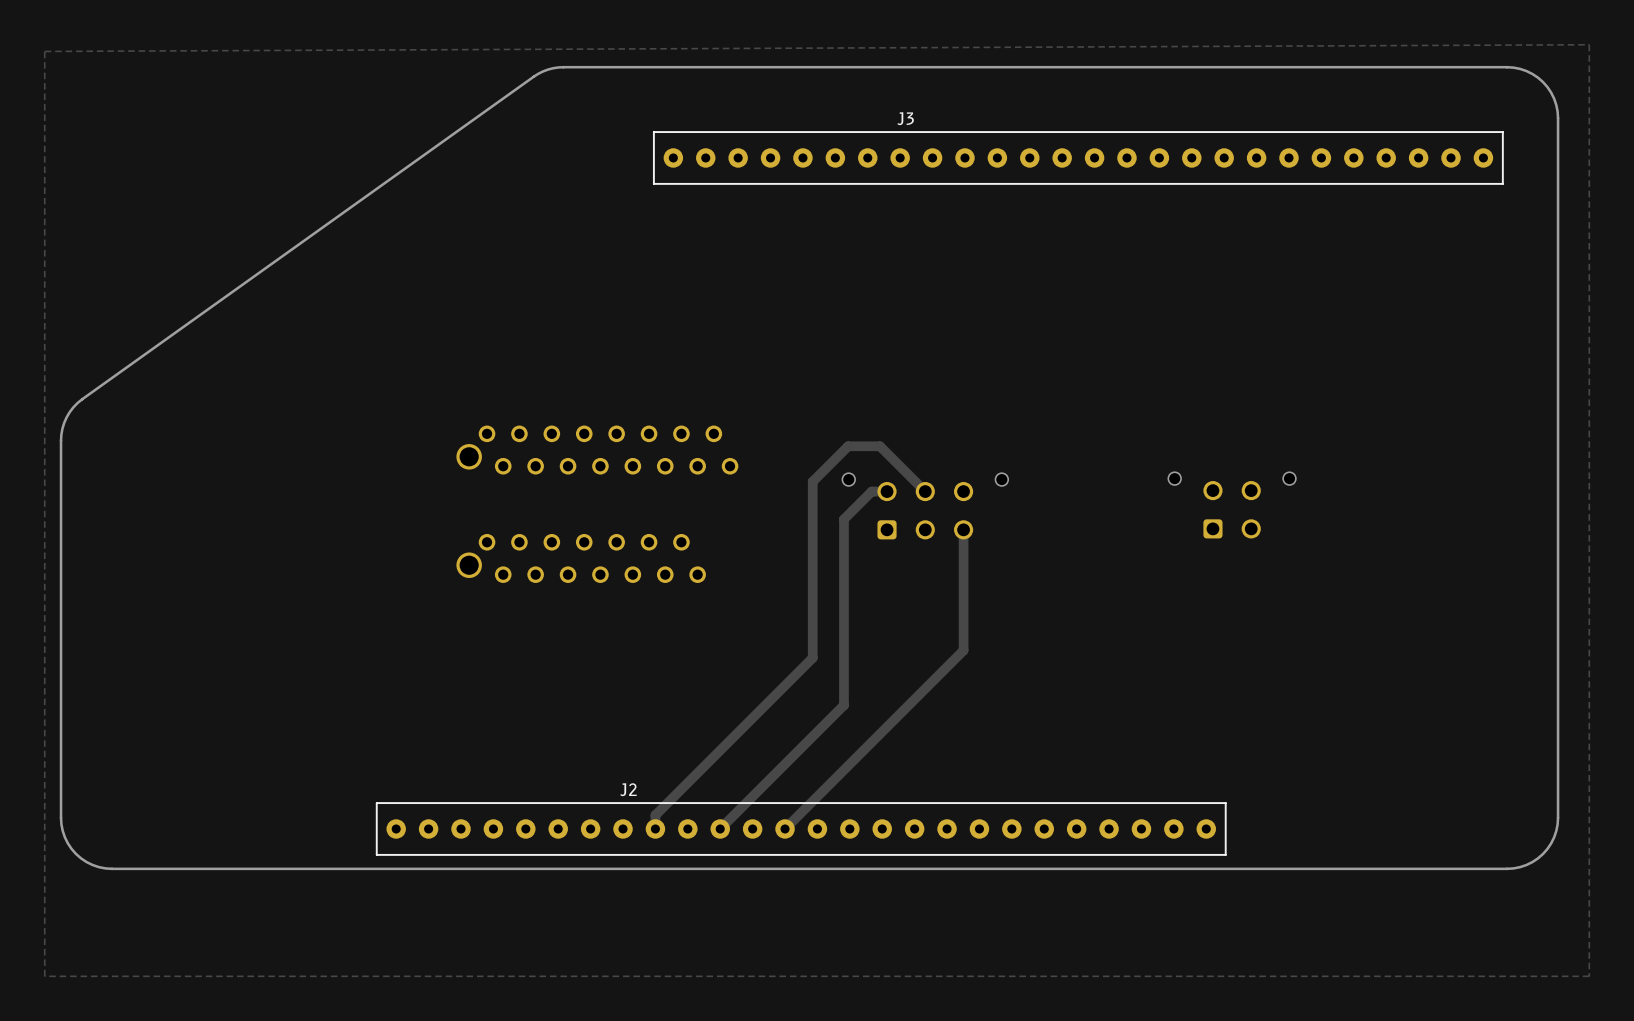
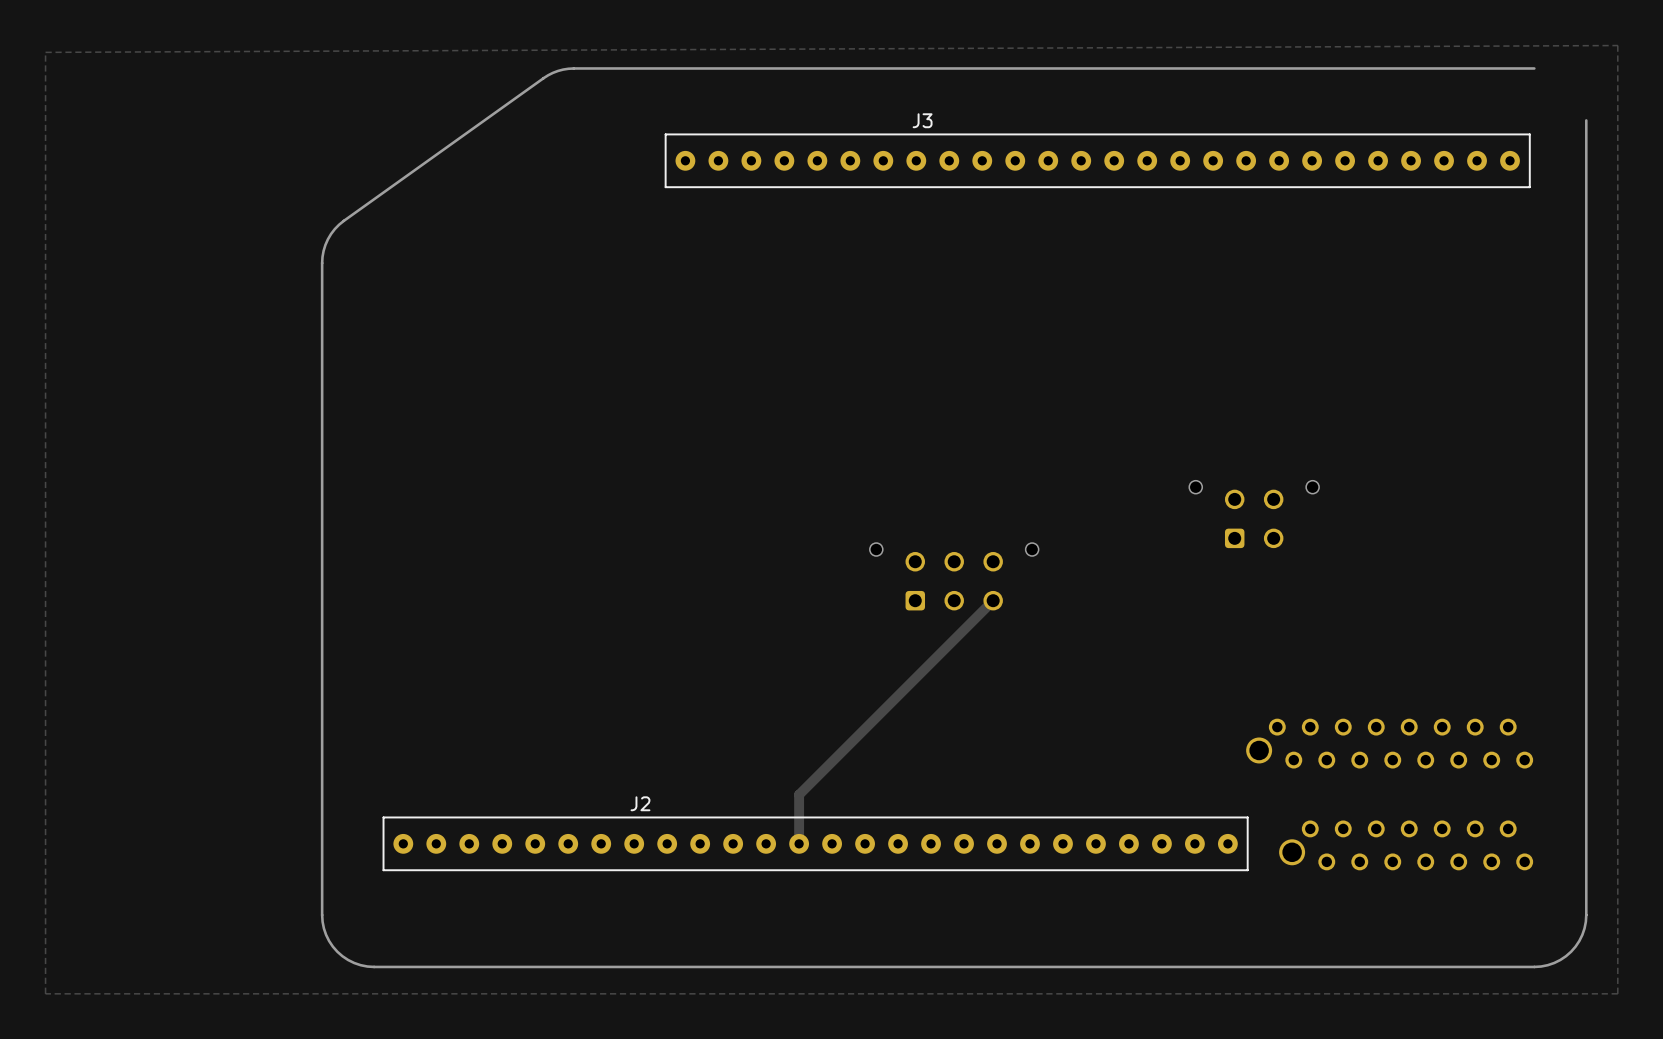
board edge: (563, 67) (547, 69) (533, 76) (82, 399) (69, 412) (64, 422) (61, 440) (61, 817) (62, 831) (67, 843) (75, 853) (86, 862) (98, 867) (112, 868) (1507, 868) (1520, 867) (1532, 862) (1543, 853) (1551, 843) (1556, 831) (1558, 817) (1558, 118) (1554, 98) (1543, 82) (1526, 71) (1507, 67) -> (573, 68) (557, 70) (543, 78) (343, 220) (331, 234) (323, 250) (322, 915) (326, 934) (332, 946) (342, 956) (360, 965) (374, 966) (1534, 966) (1554, 963) (1571, 951) (1582, 934) (1586, 915)
board edge: none -> (1586, 120) (1586, 915)
part: (597, 450) -> none
track: (887, 491) (871, 491) (843, 519) (843, 705) (720, 828) -> none
track: (925, 491) (880, 446) (848, 446) (812, 481) (812, 657) (655, 815) (655, 828) -> none
part position: (925, 506) -> (954, 576)
track: (963, 529) (963, 650) (785, 828) -> (993, 600) (799, 794) (799, 843)
part: (581, 558) -> none
part: none -> (1389, 743)
part: none -> (1406, 845)

